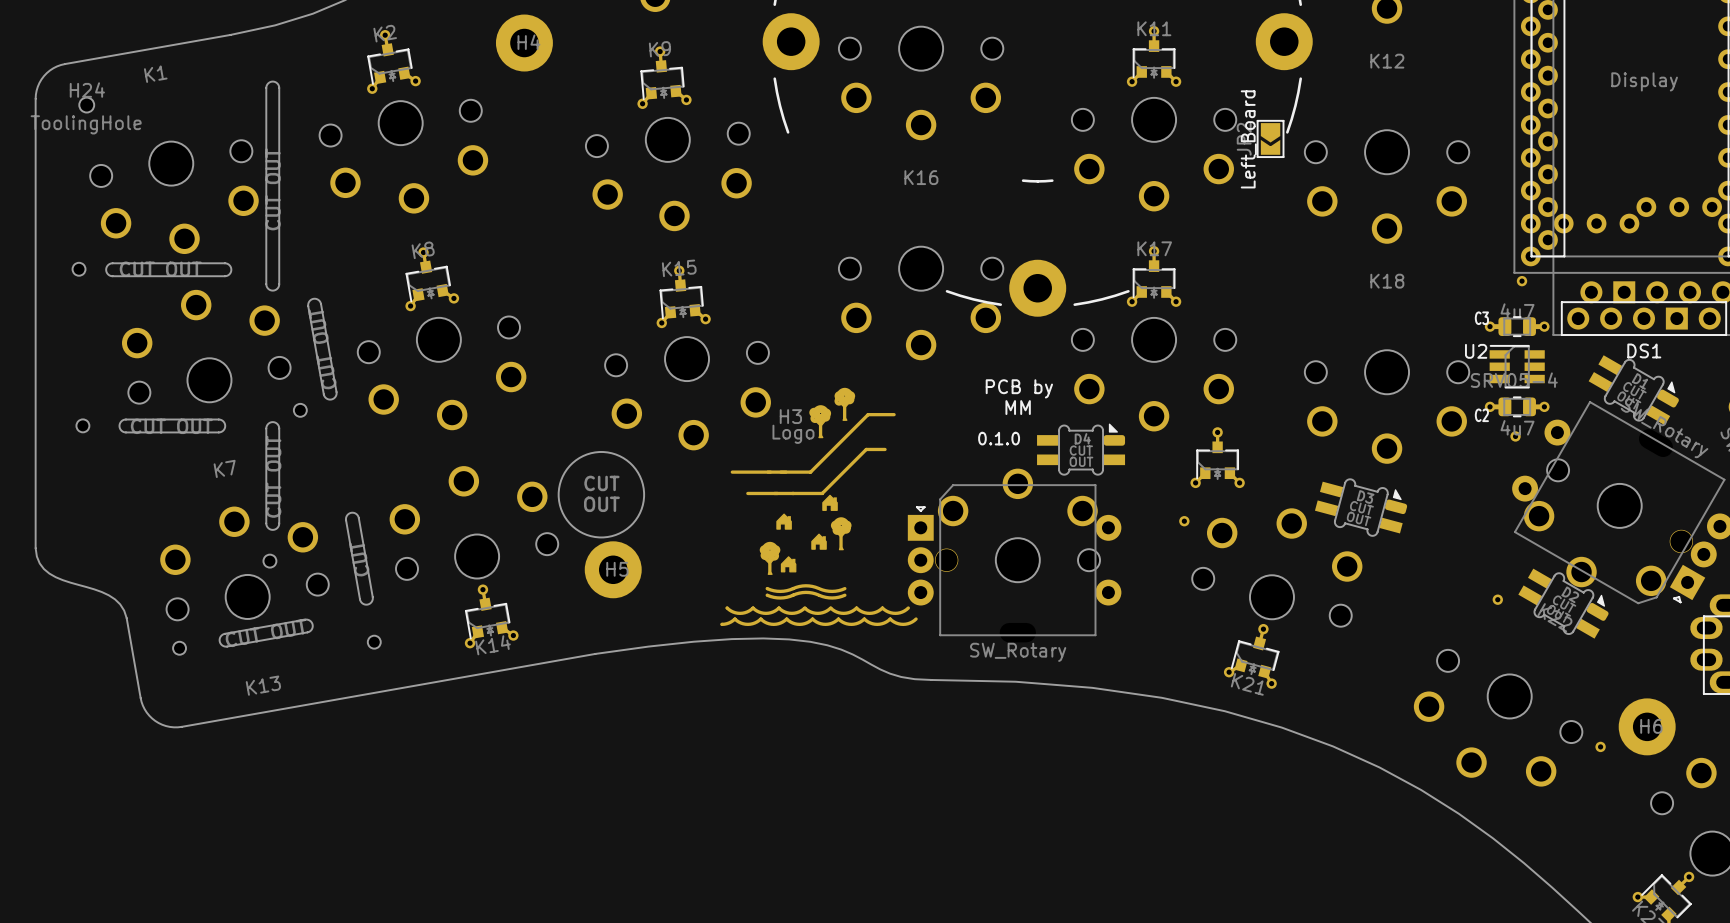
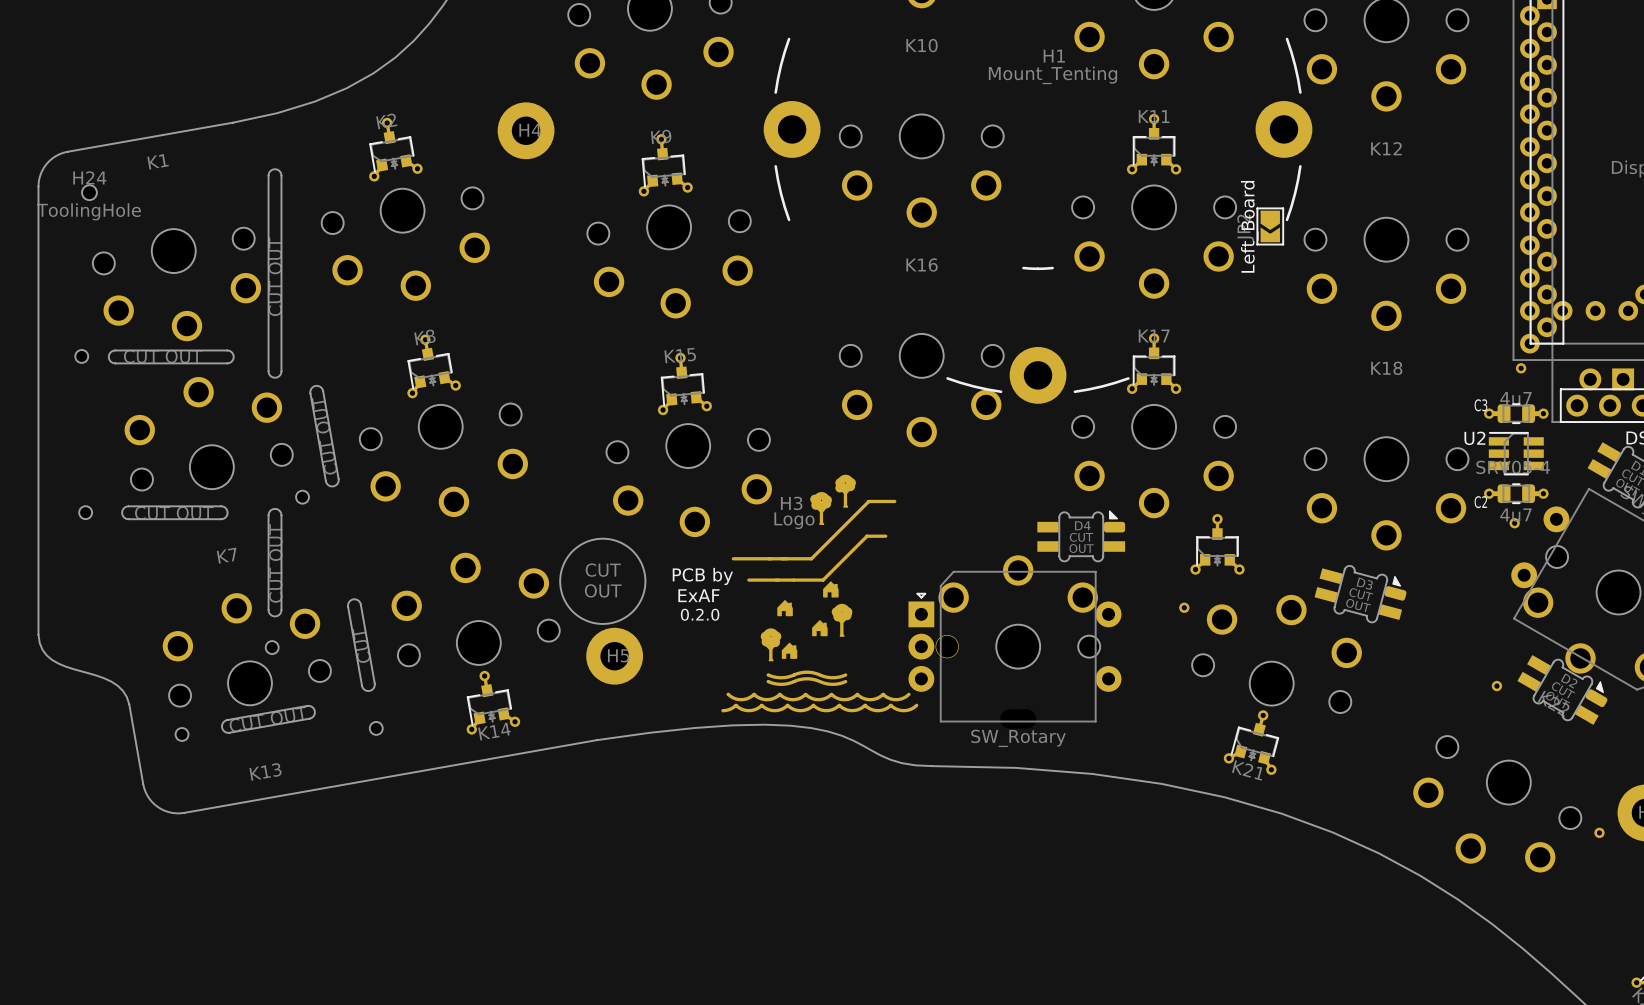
text: PCB by (1019, 388) -> none
text: MM (1018, 407) -> none
text: 0.1.0 (999, 438) -> none
text: none -> PCB by (702, 576)
text: none -> ExAF (698, 595)
text: none -> 0.2.0 (700, 614)

